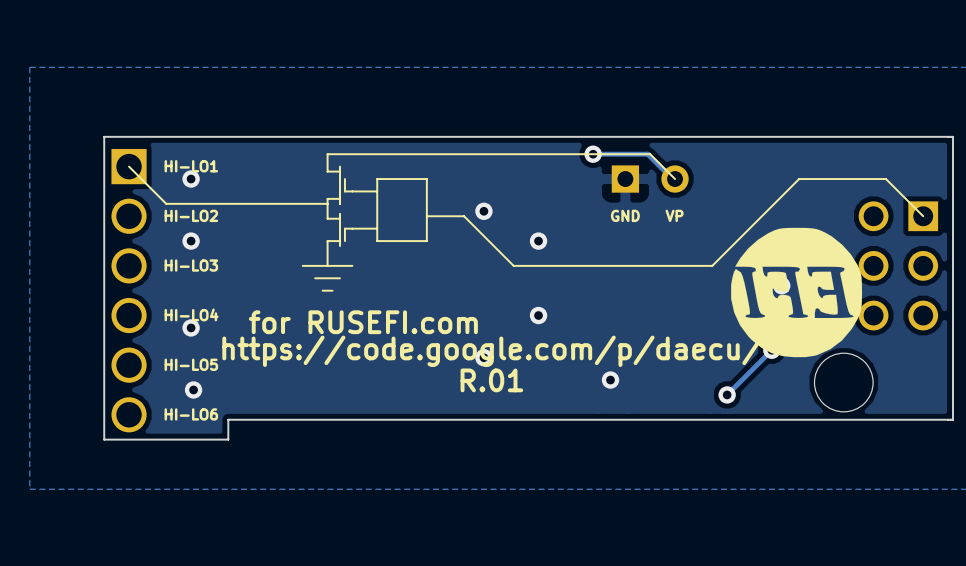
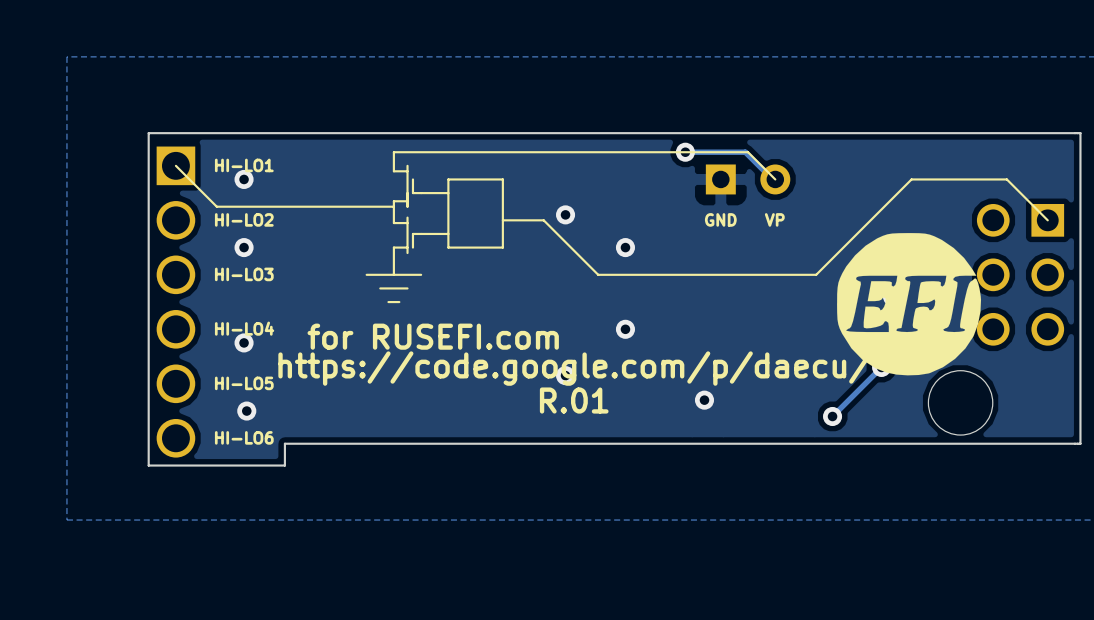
drawing shape: [731, 227, 863, 358] -> [837, 233, 982, 376]

